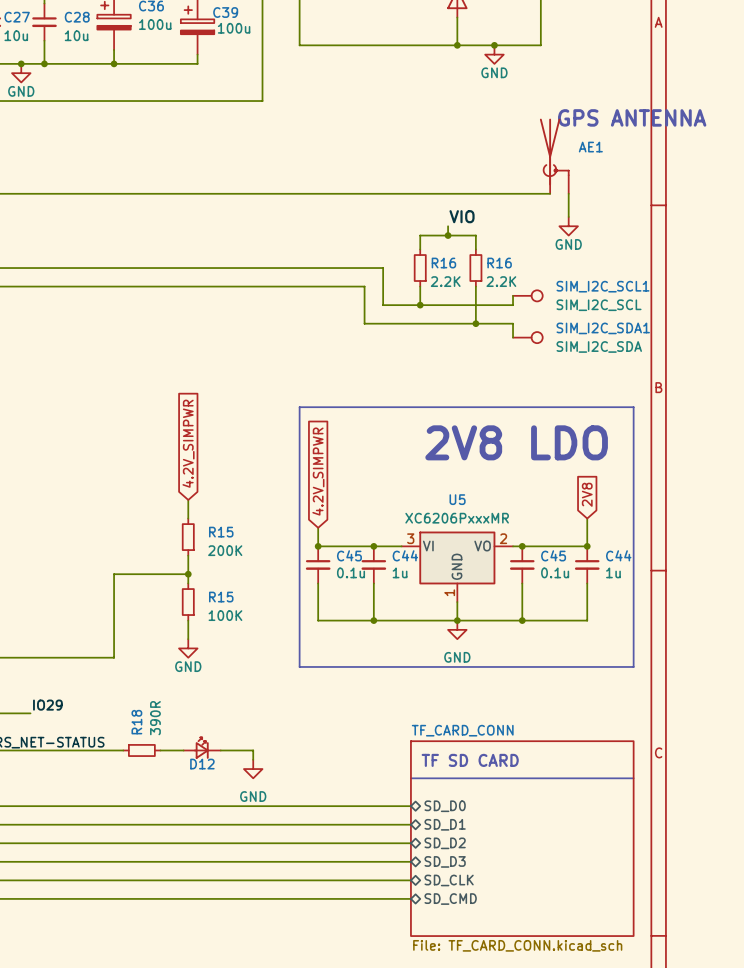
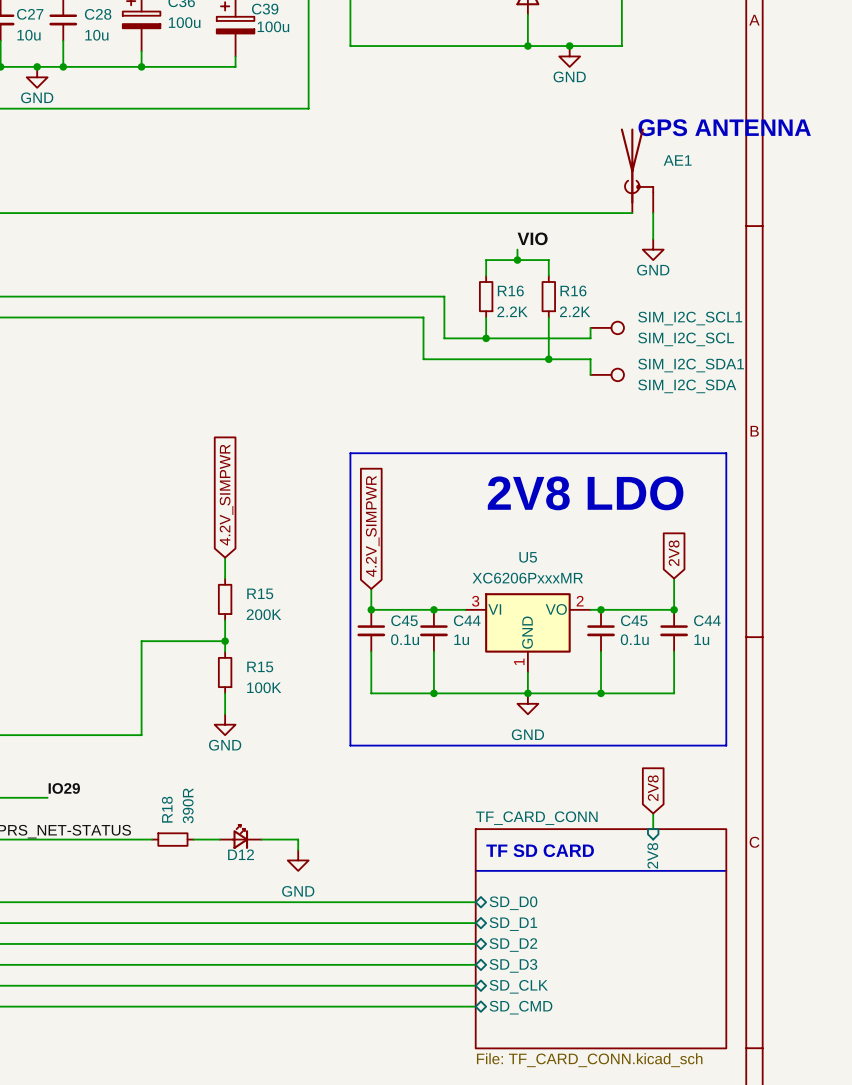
global label: none -> 2V8 (653, 788)
wire: none -> (653, 813) (653, 829)
sheet pin: none -> 2V8 (652, 855)

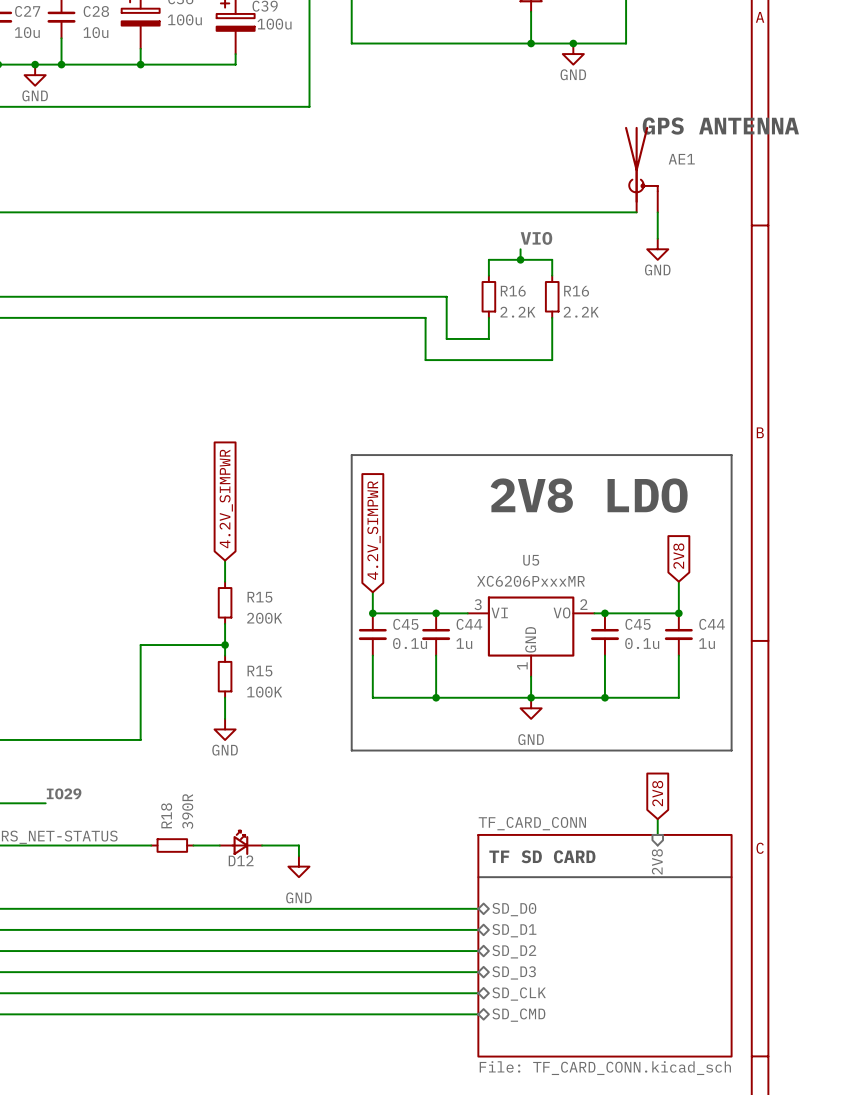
wire: (590, 327) (590, 338) (486, 338) -> none
SIM_I2C_SCL1: SIM_I2C_SCL (607, 327) -> none
junction: (486, 338) -> none
wire: (548, 359) (590, 359) (590, 374) -> none
junction: (548, 359) -> none
SIM_I2C_SDA1: SIM_I2C_SDA (607, 374) -> none

